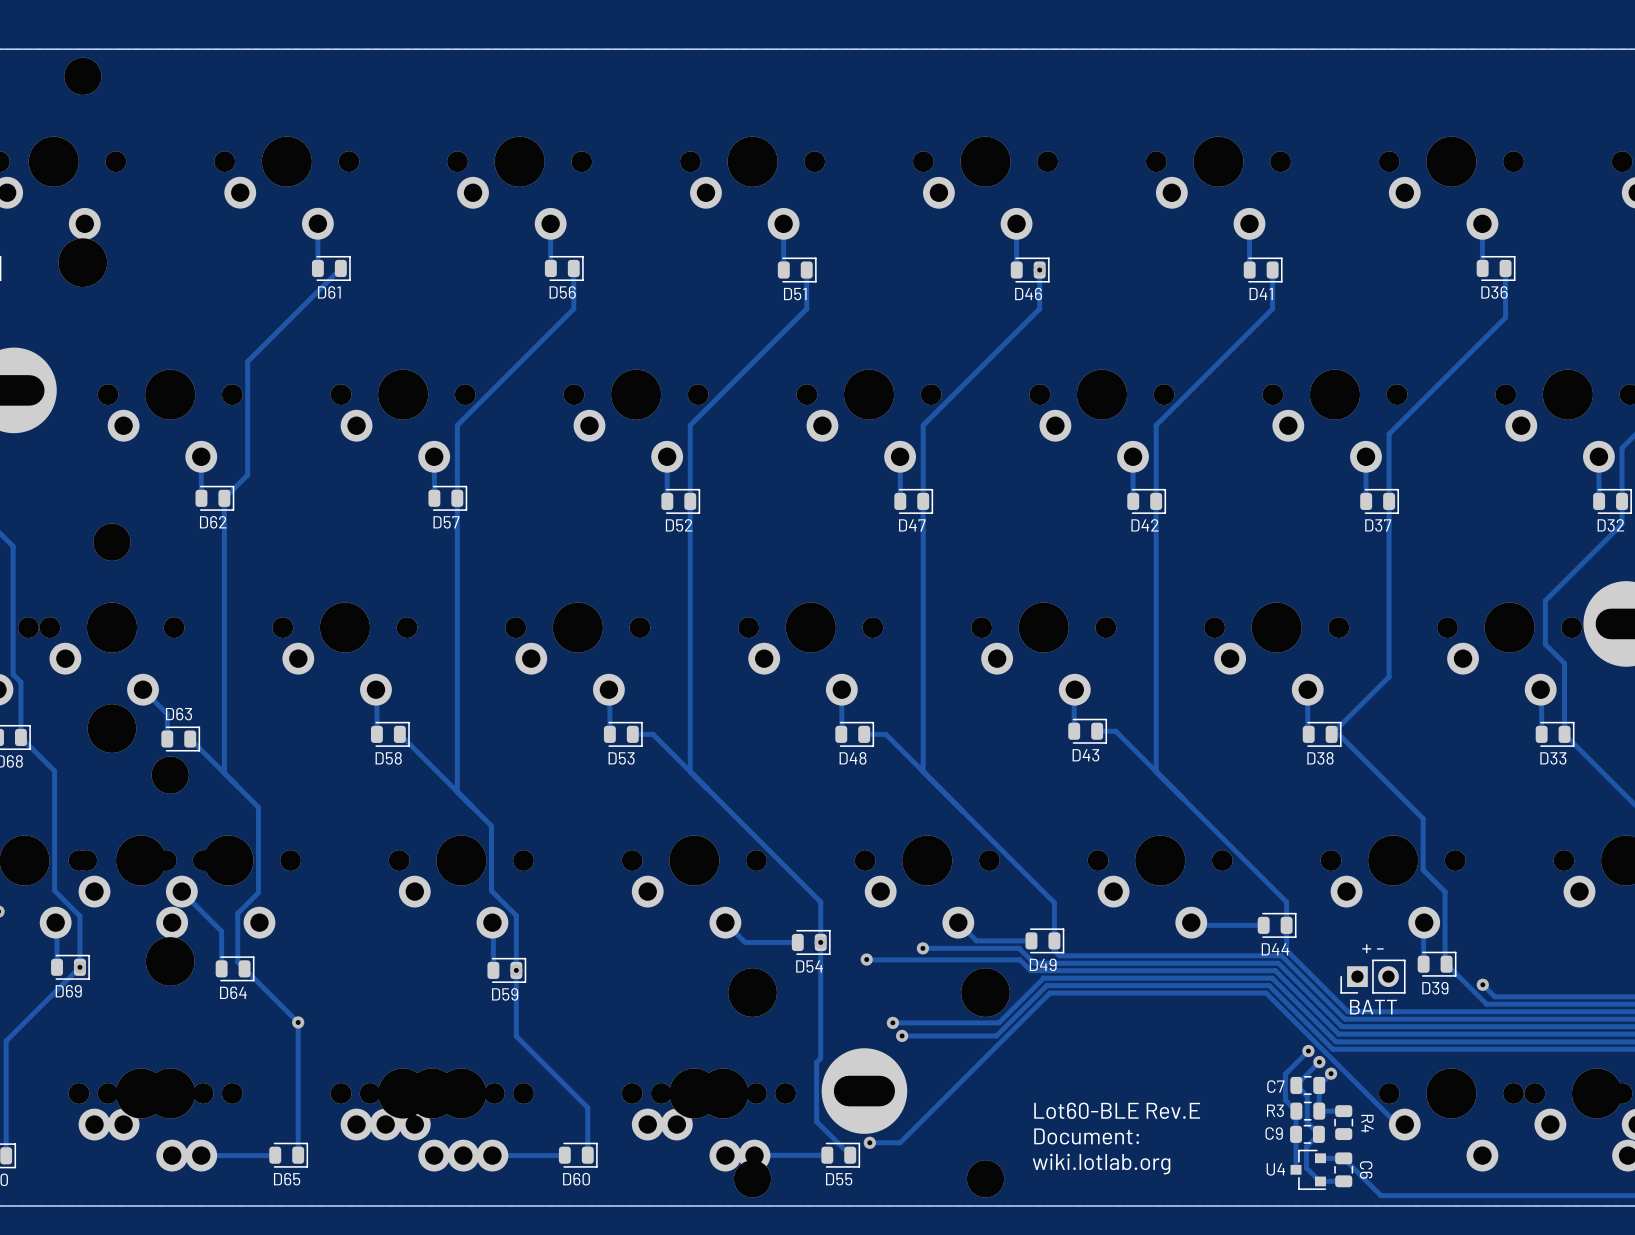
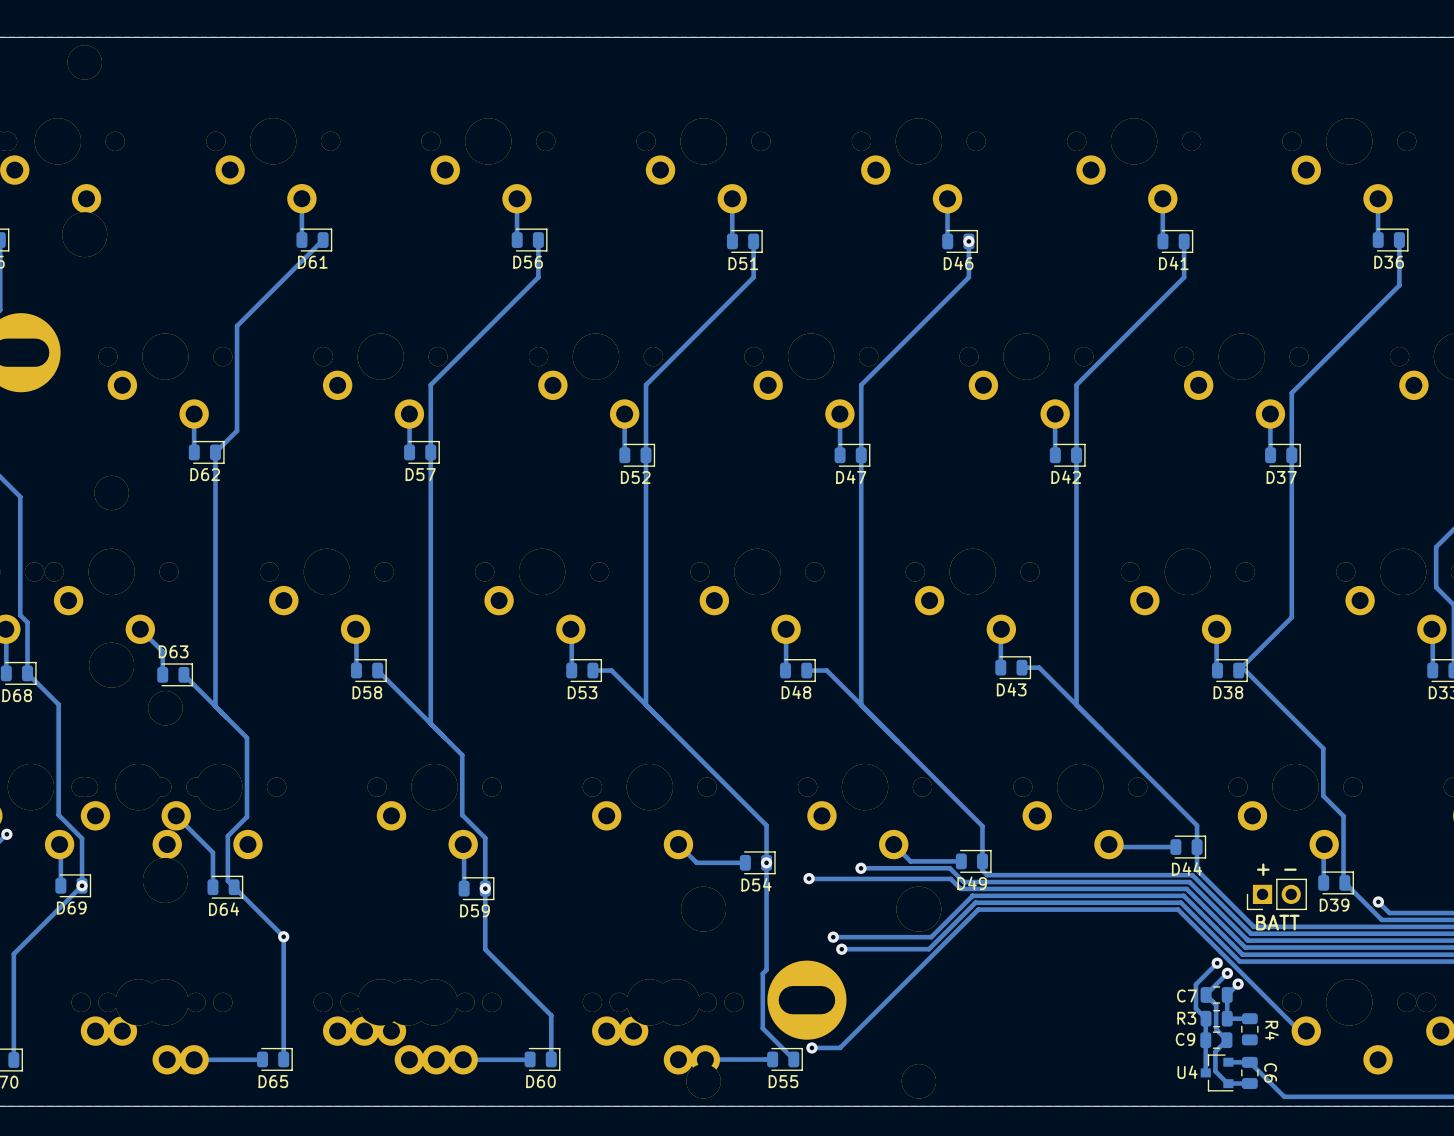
text: Lot60-BLE Rev.E (1117, 1110) -> none
text: Document: (1086, 1136) -> none
text: wiki.lotlab.org (1101, 1164) -> none

